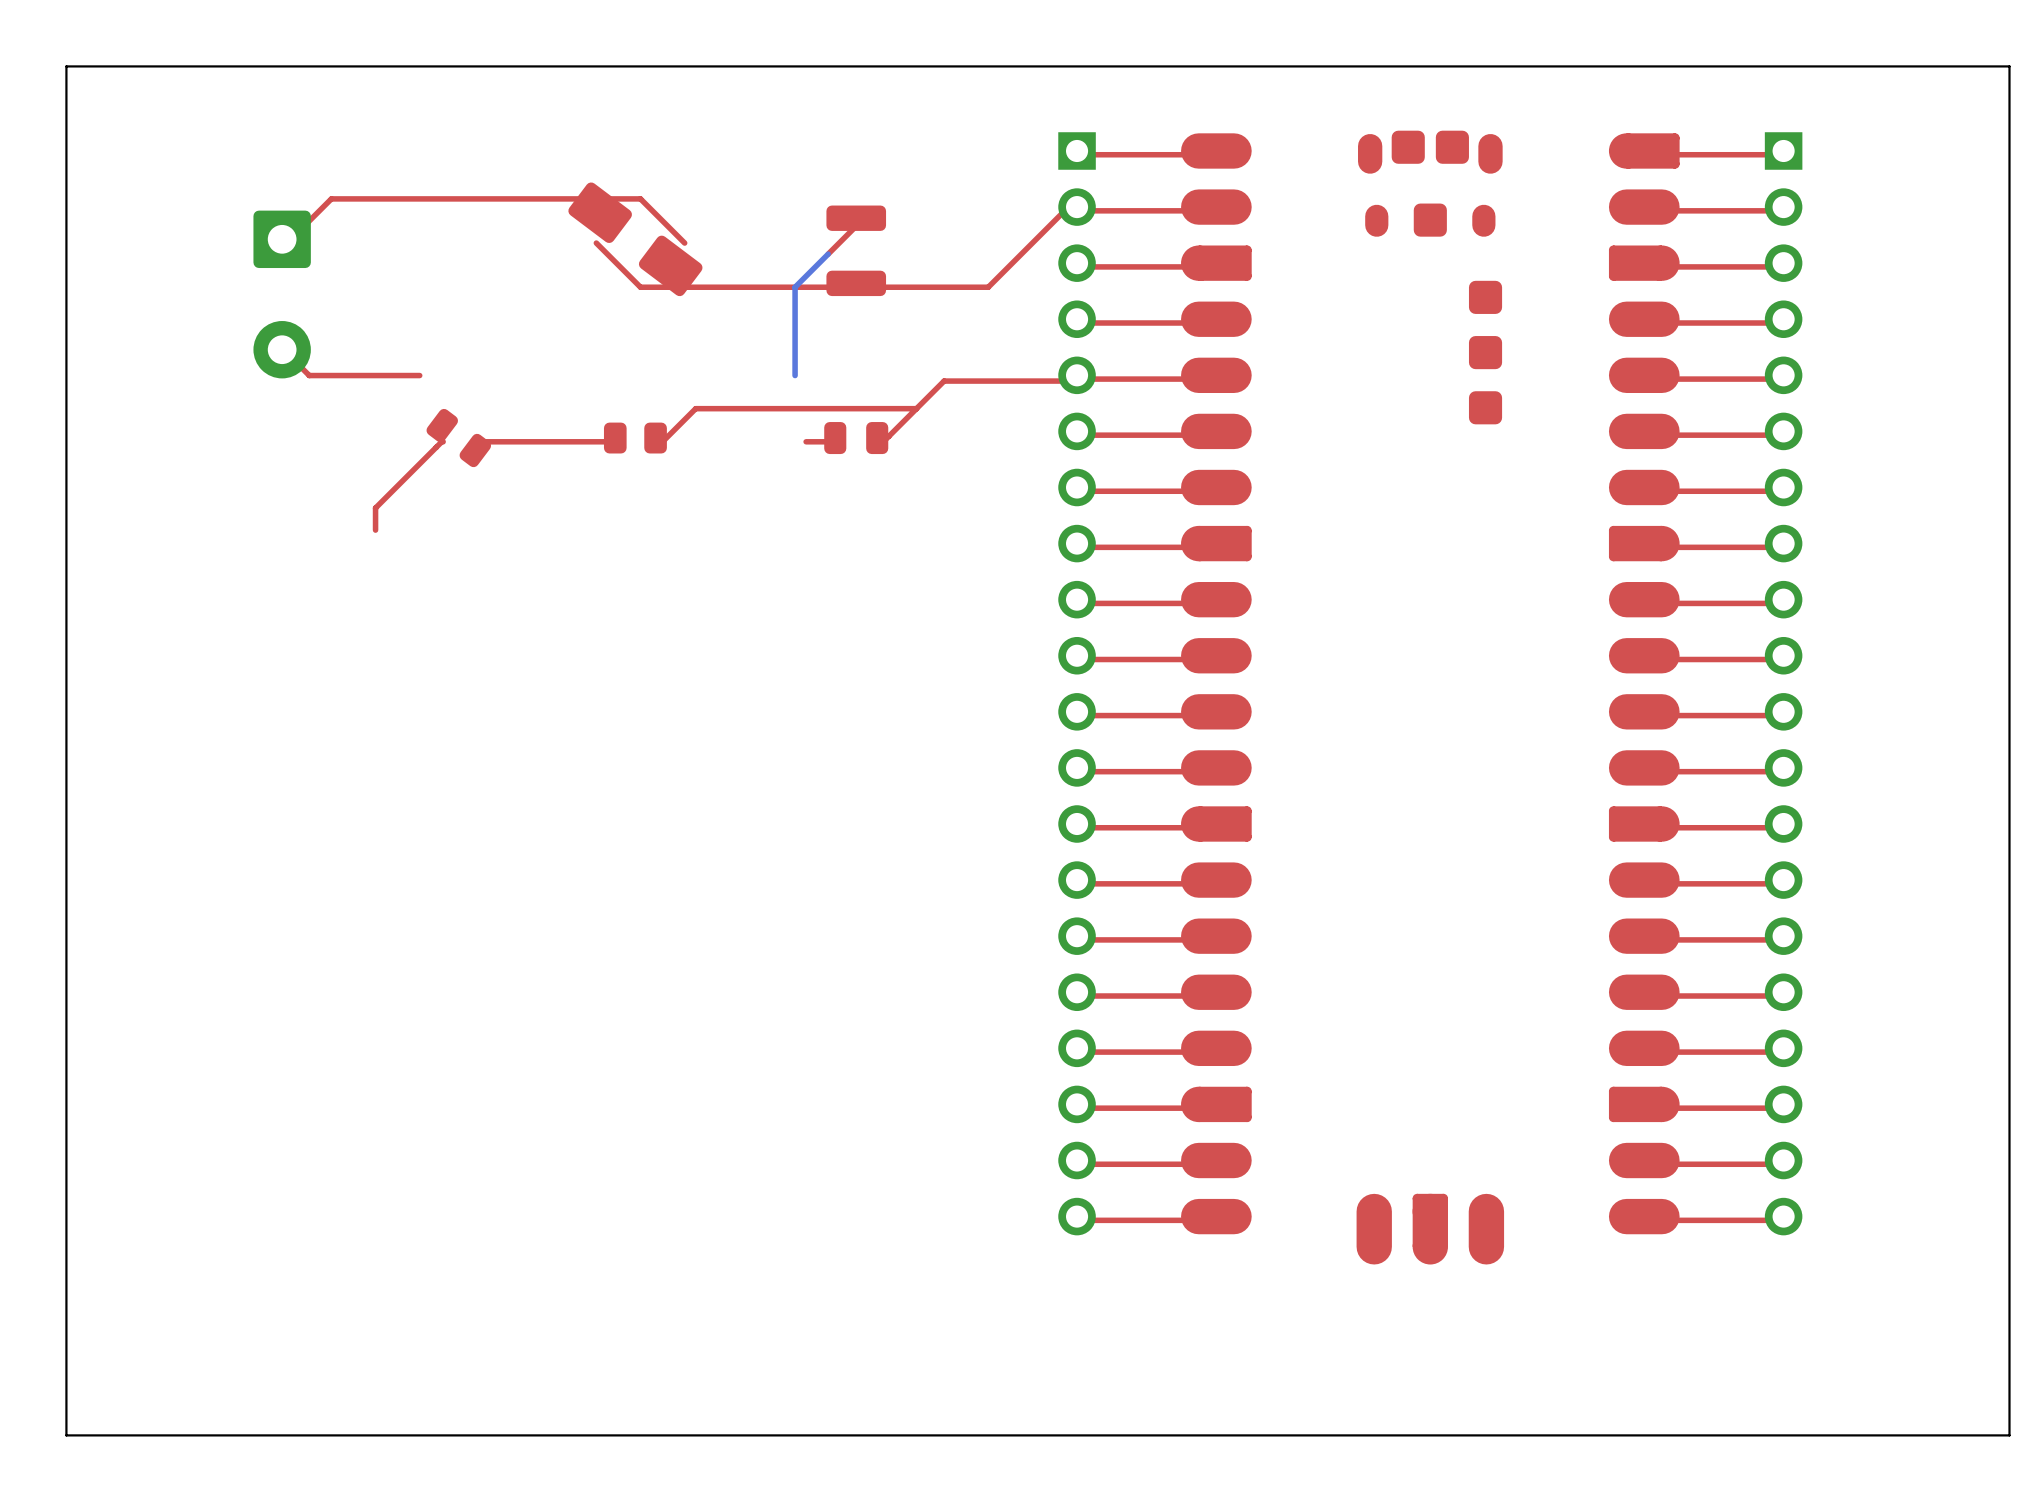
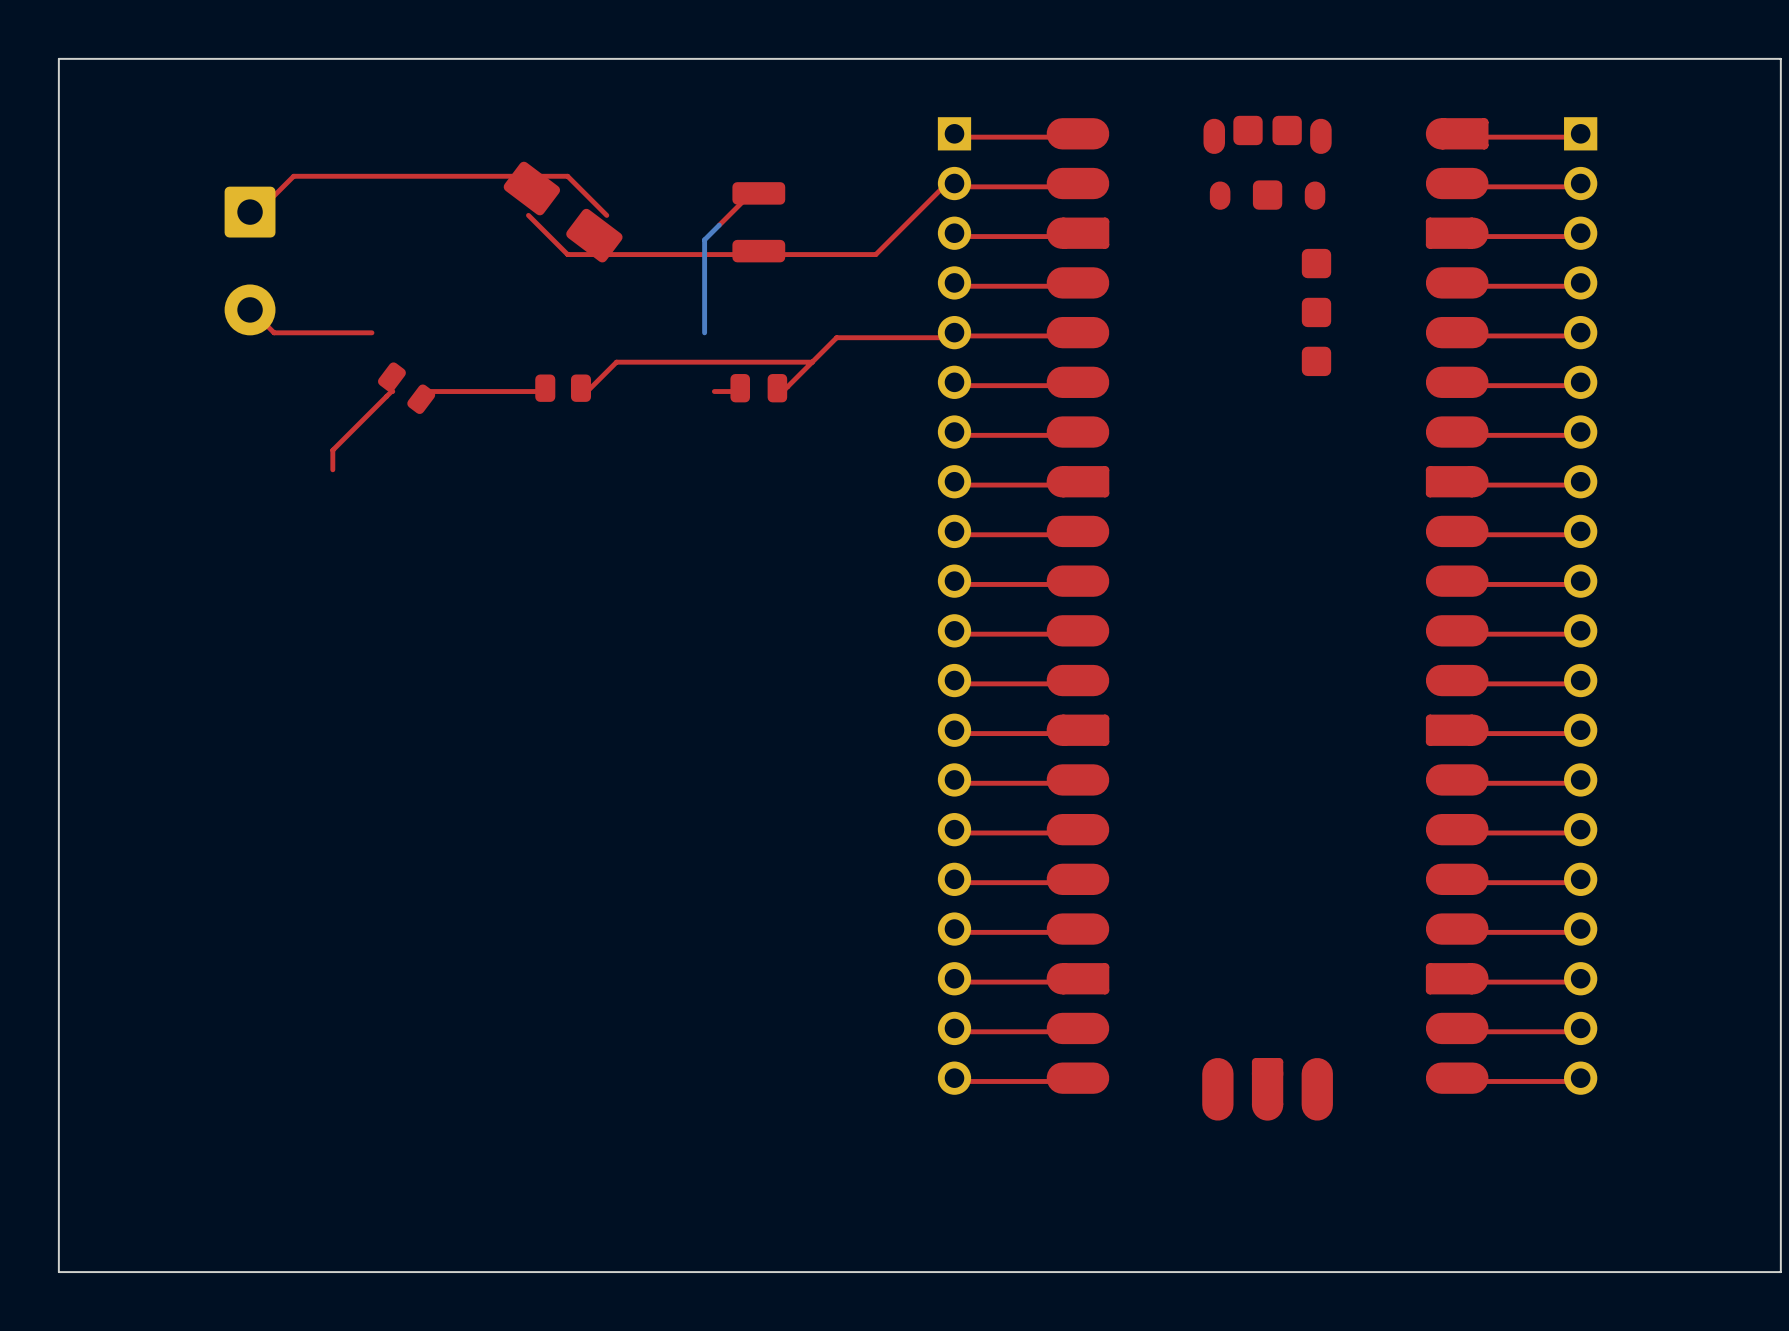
top track: (860, 221) (828, 254) -> (762, 196) (748, 195) (719, 225)
bottom track: (828, 254) (795, 287) -> (719, 225) (704, 239) (704, 254)

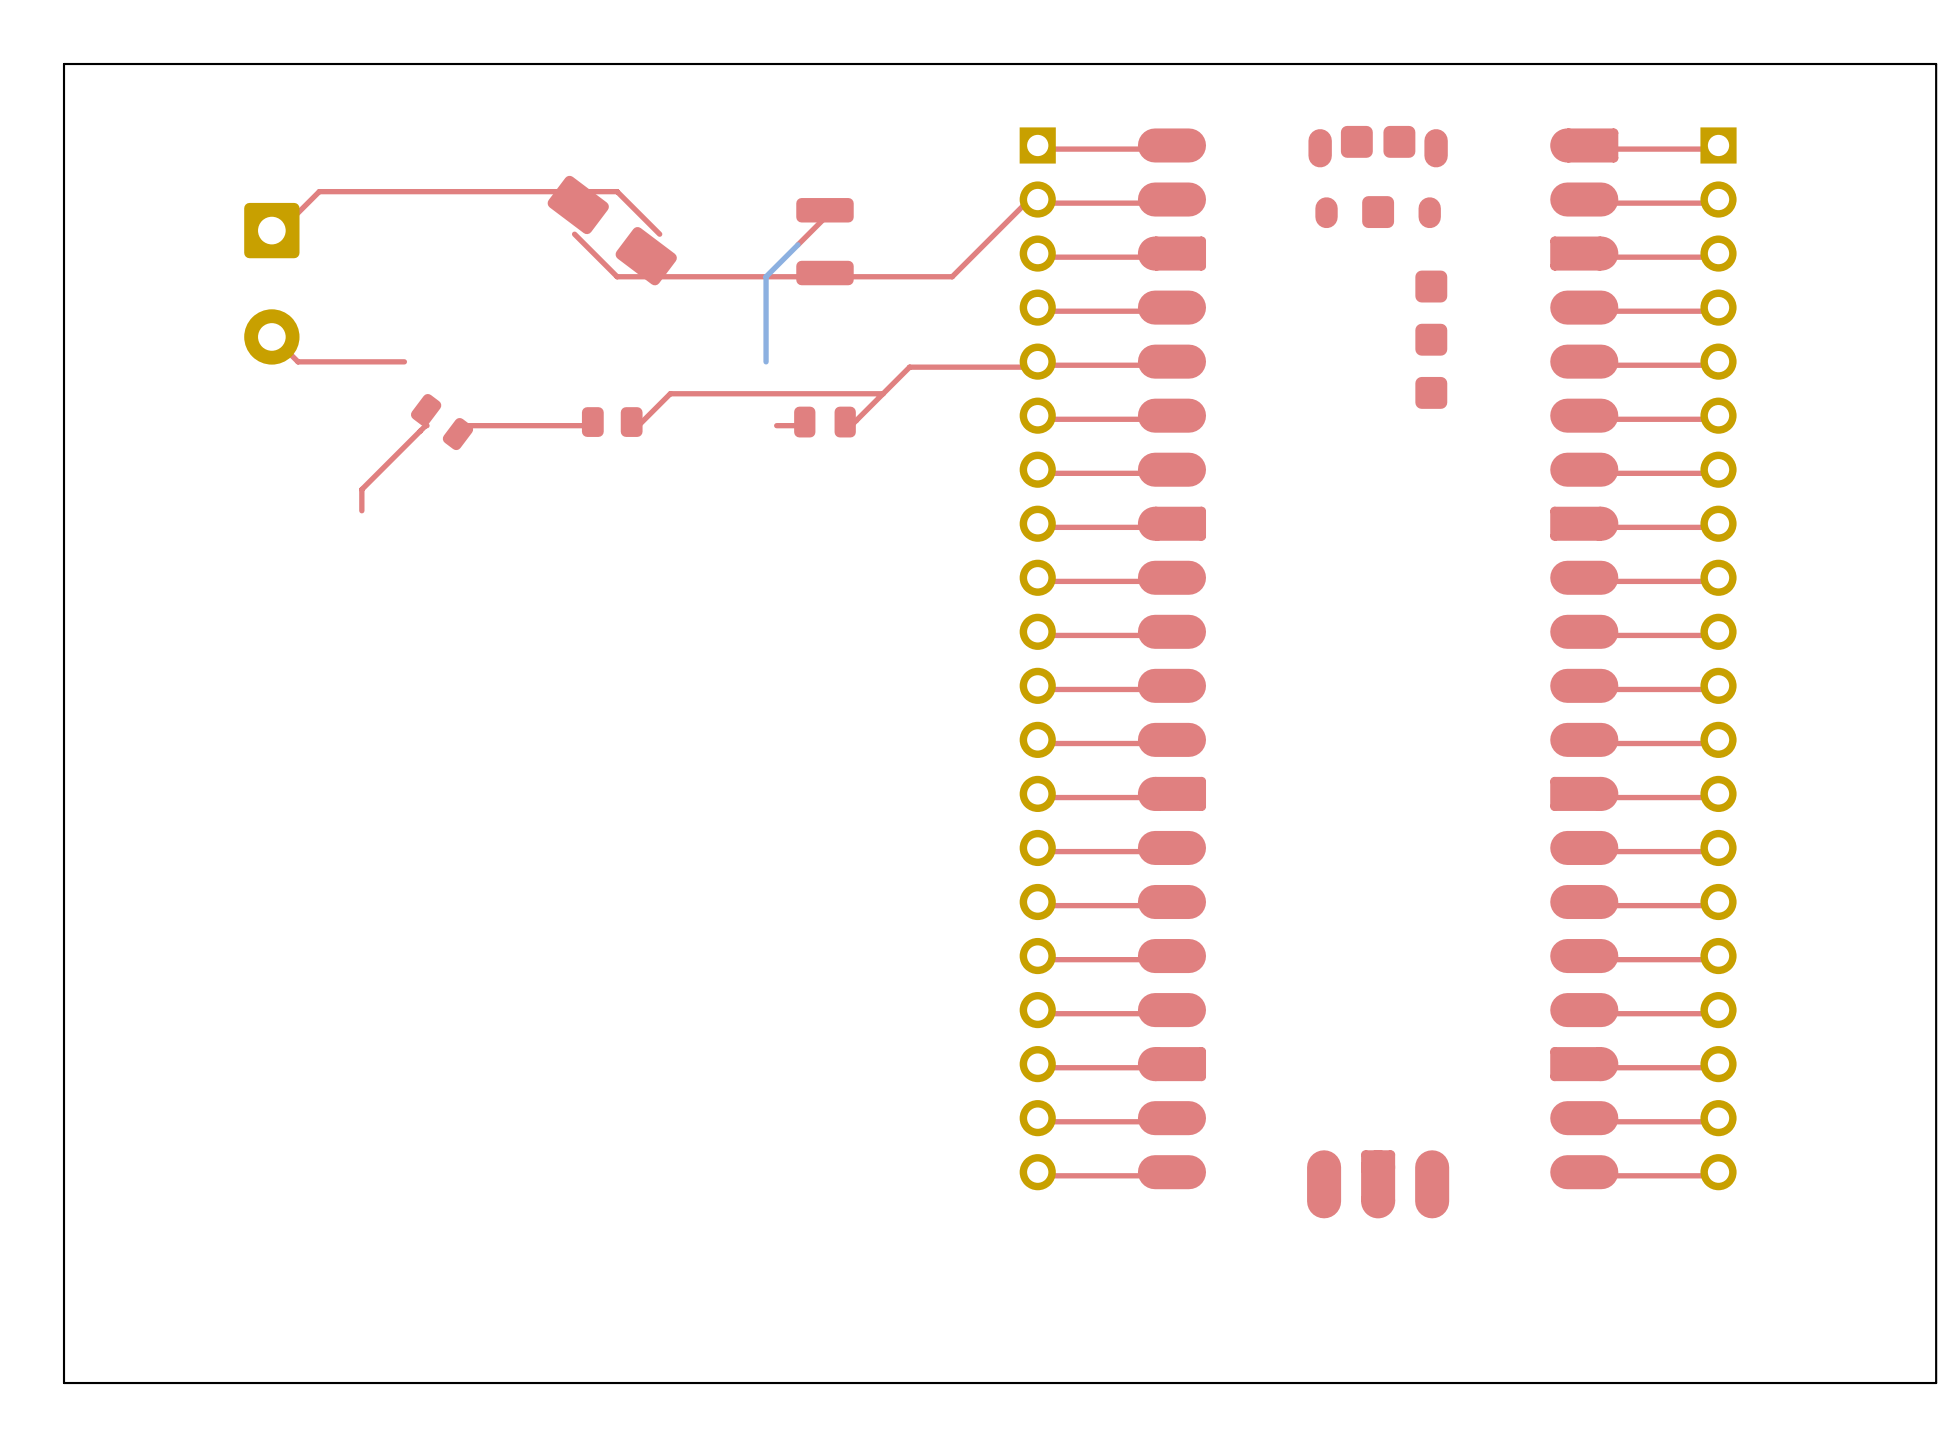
top track: (762, 196) (748, 195) (719, 225) -> (828, 213) (797, 244)
bottom track: (719, 225) (704, 239) (704, 254) -> (797, 244) (766, 276)

